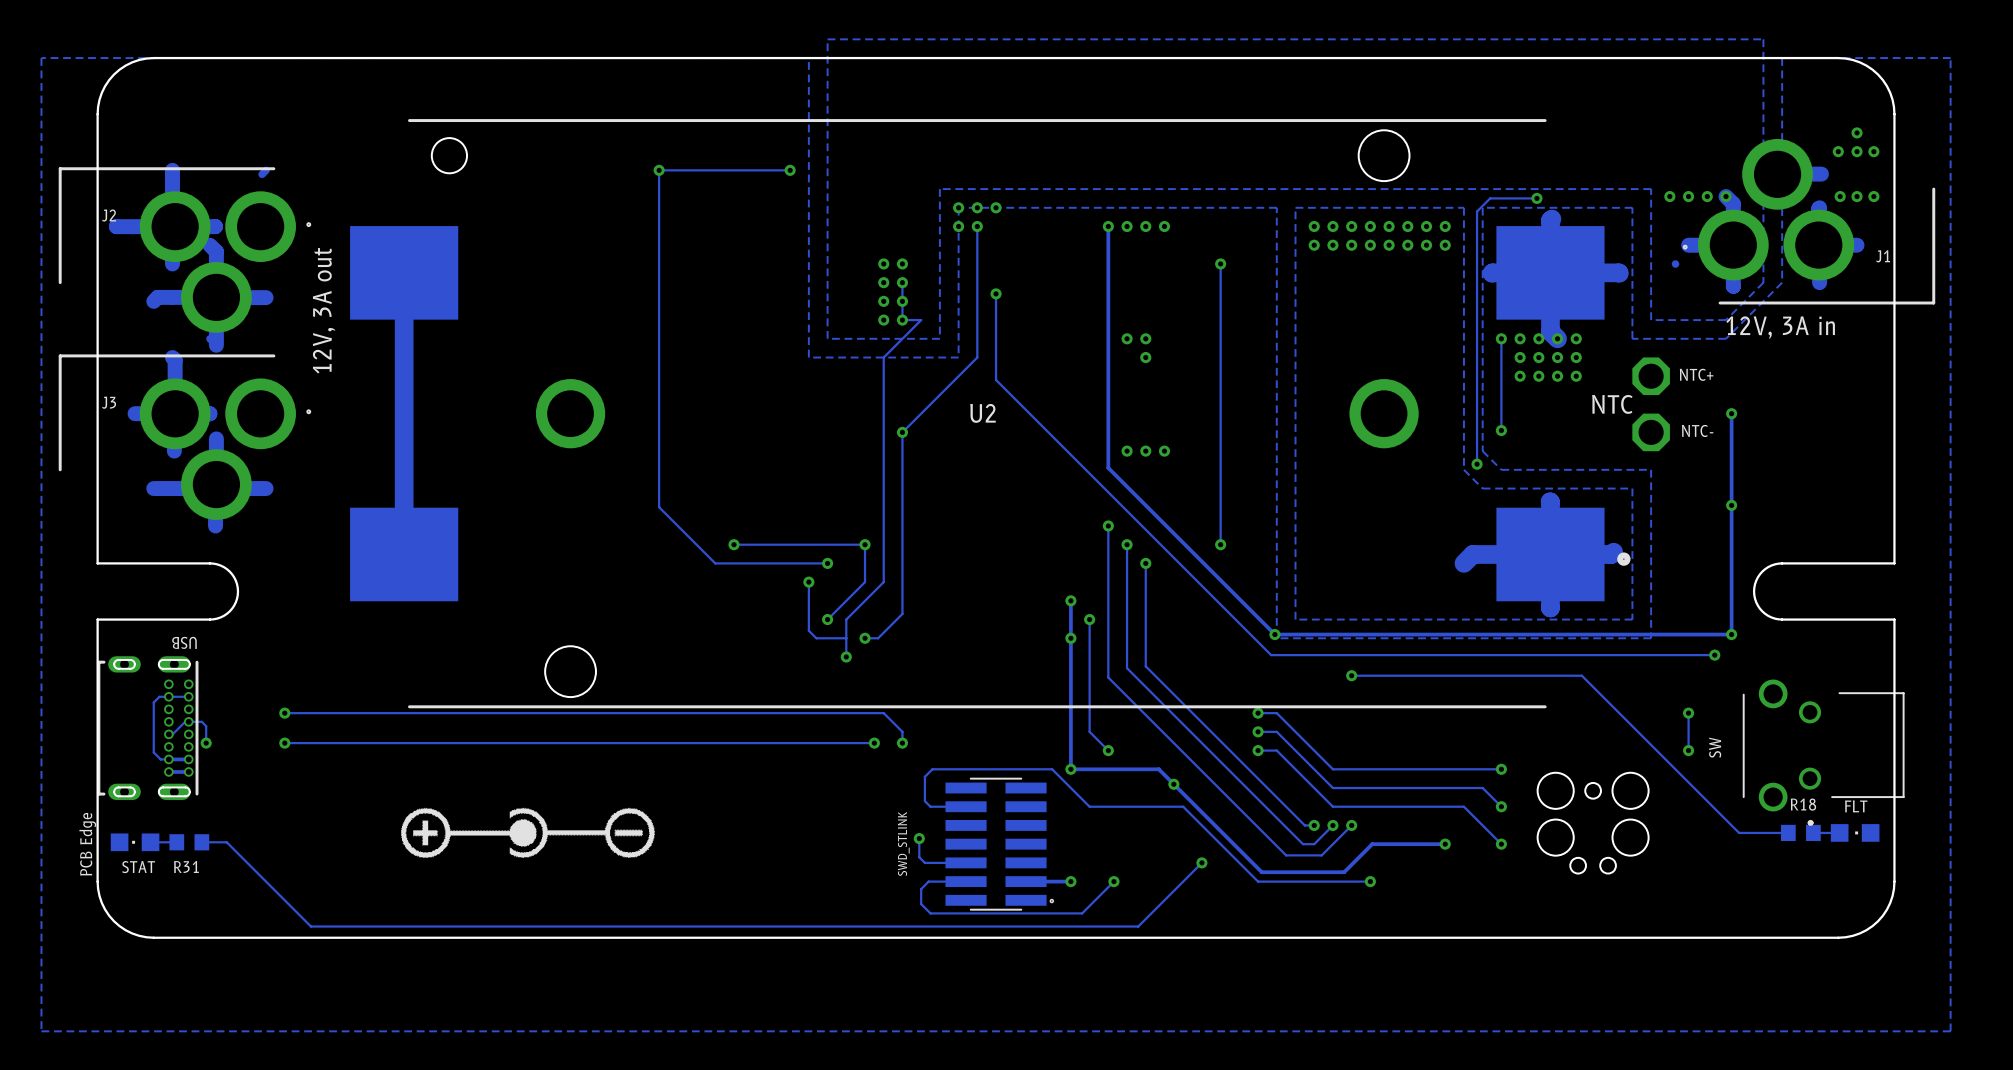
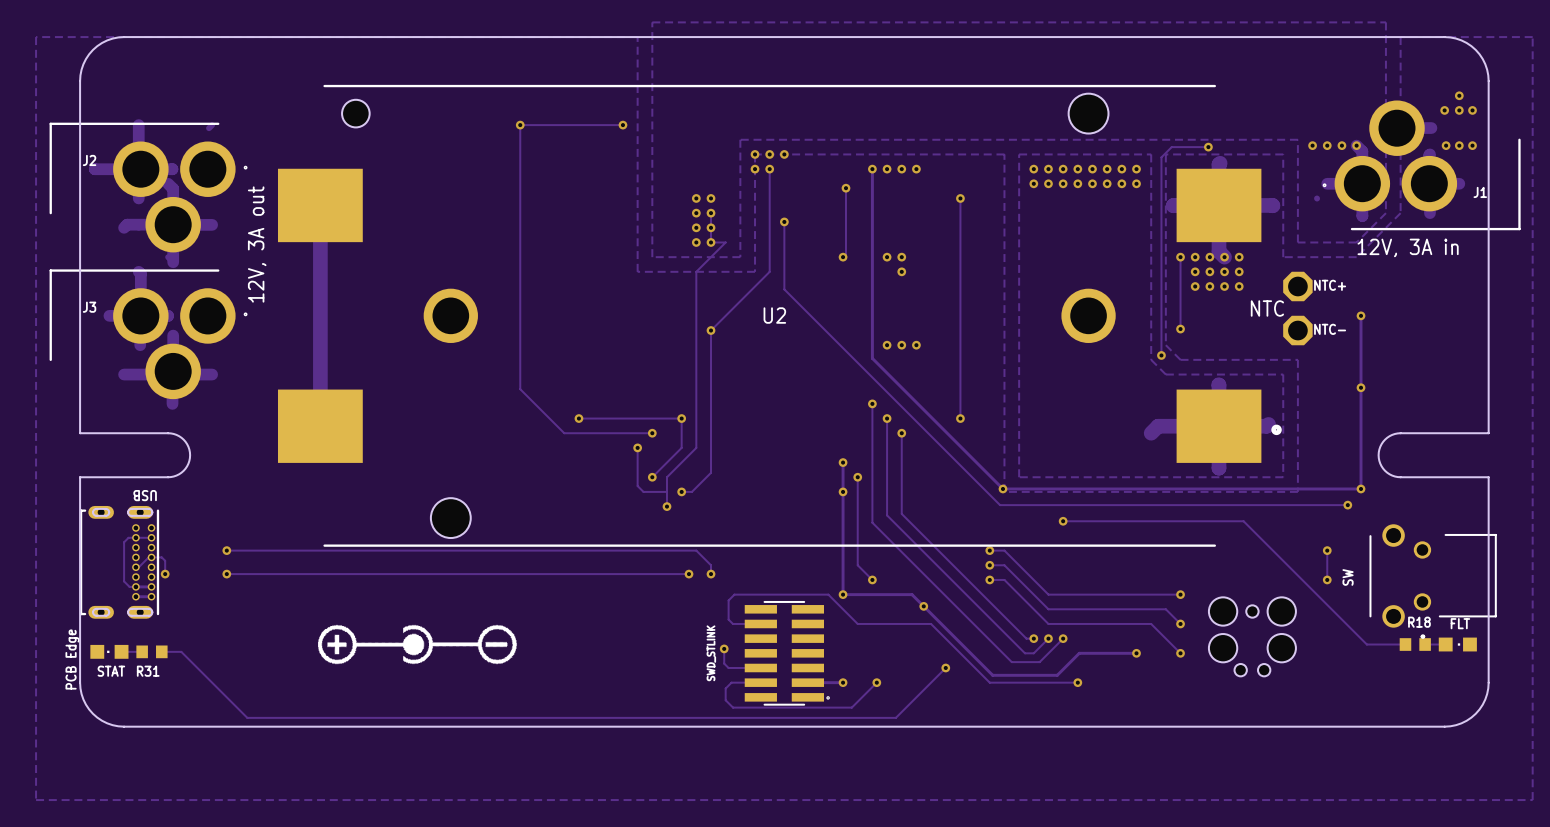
track: none -> (845, 188) (845, 254) (843, 257)
via: none -> (845, 188)
via: none -> (843, 257)

